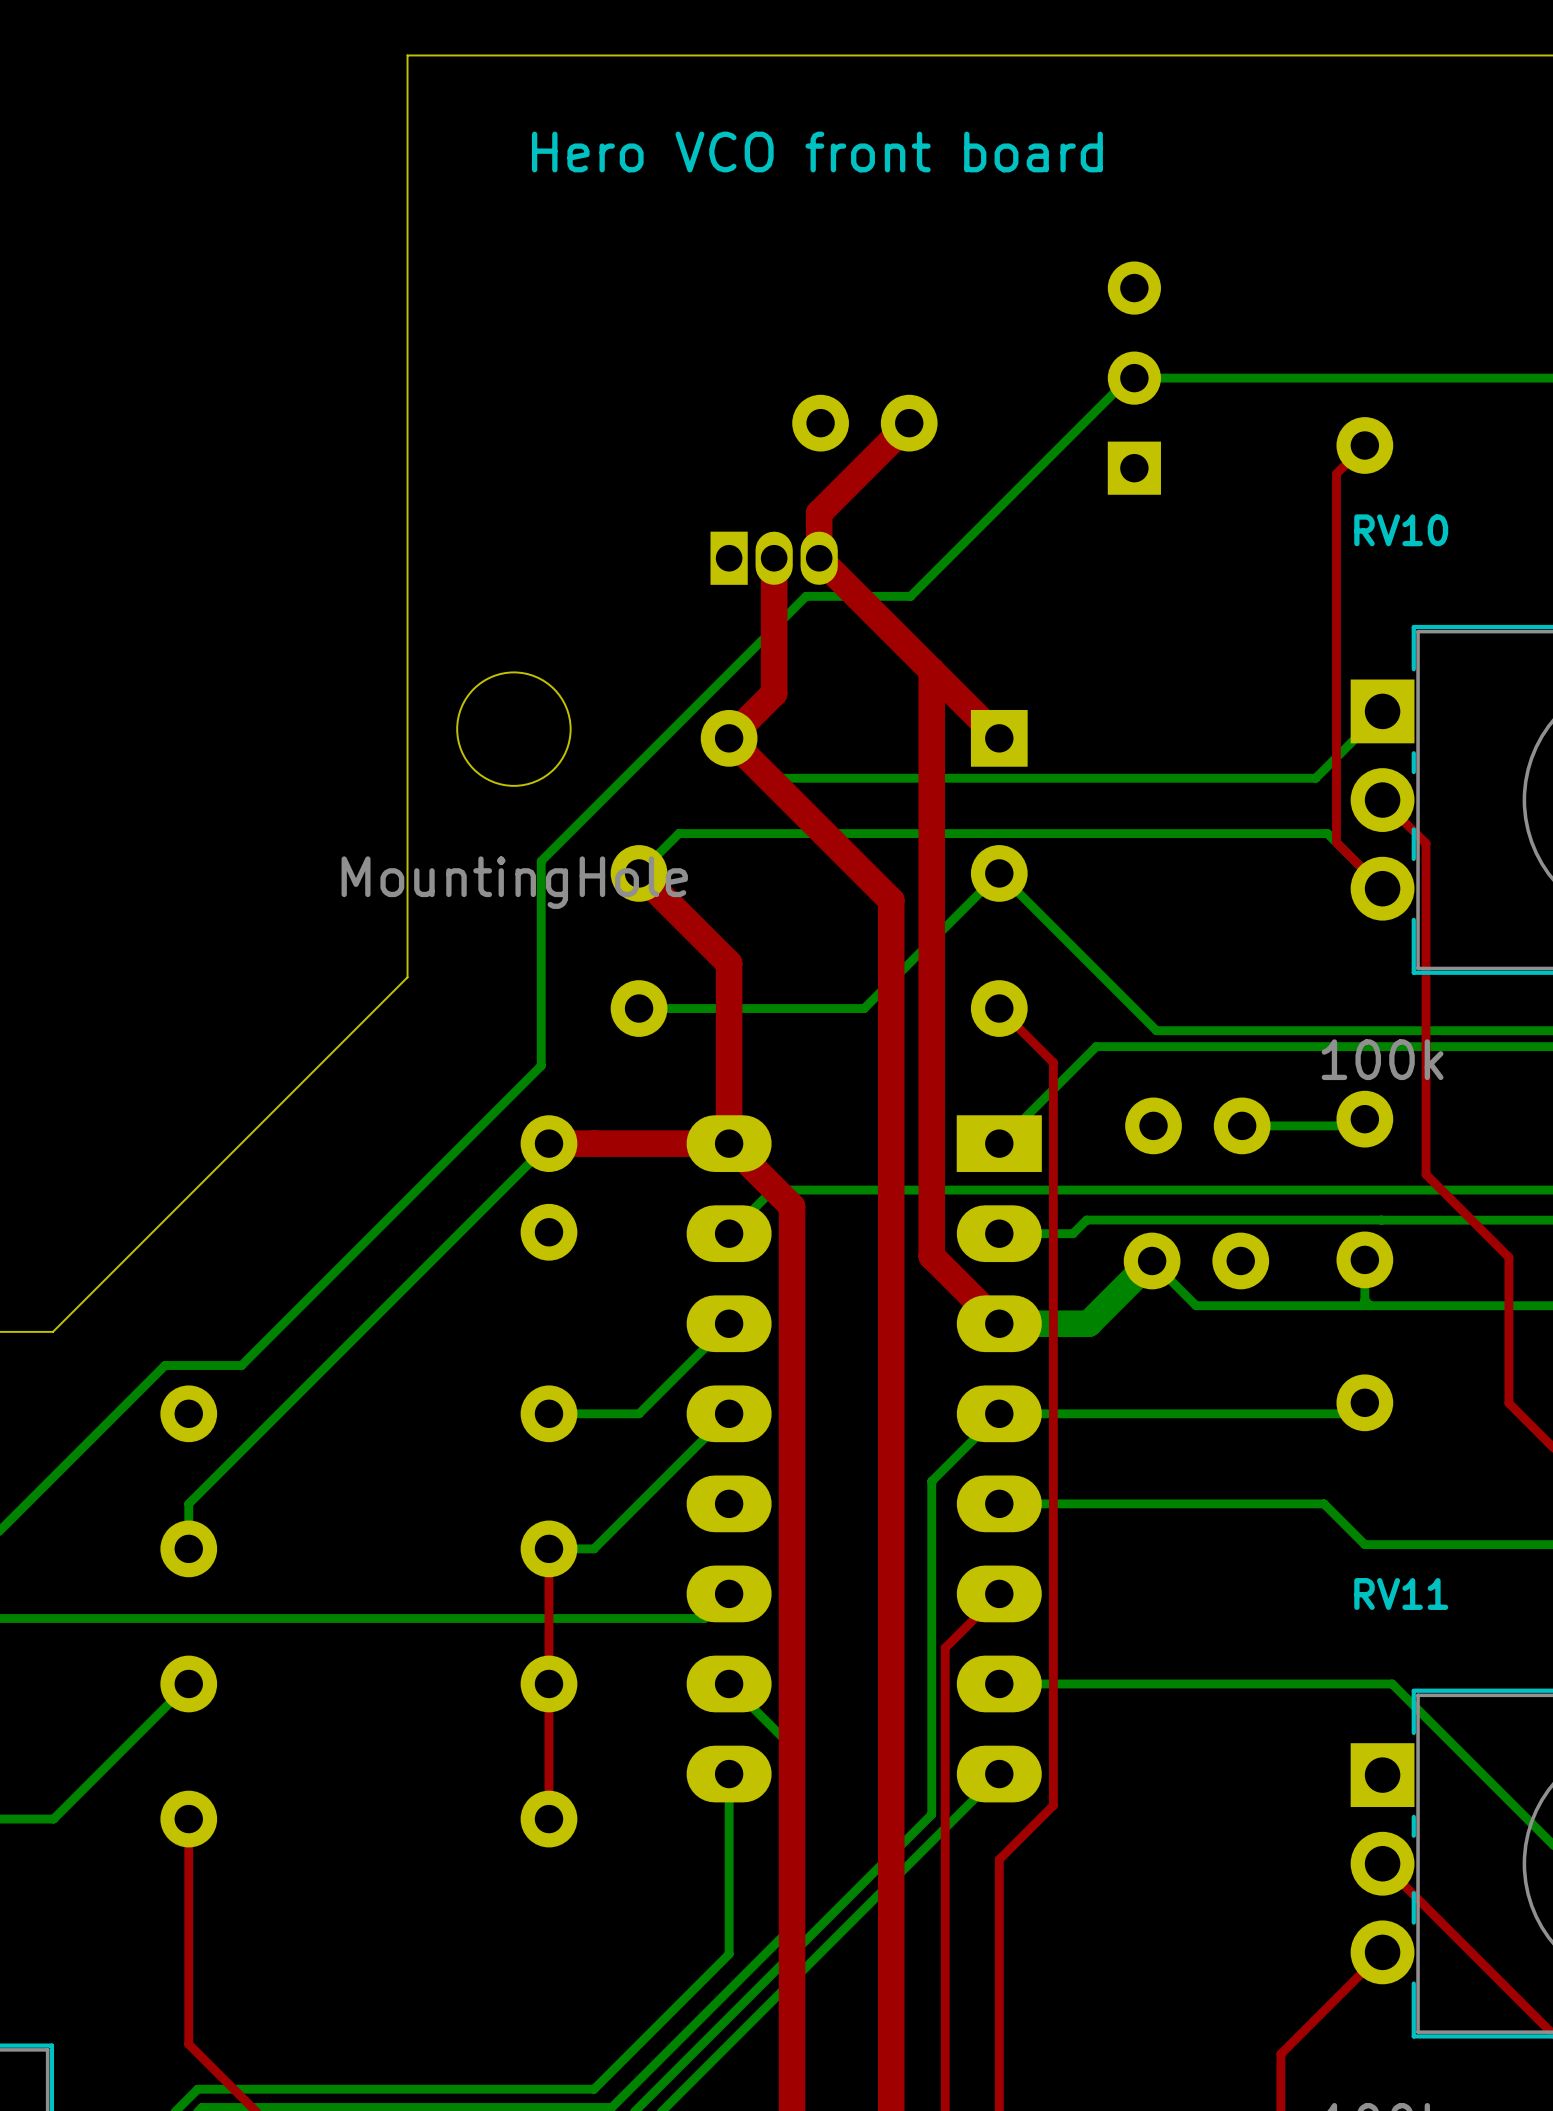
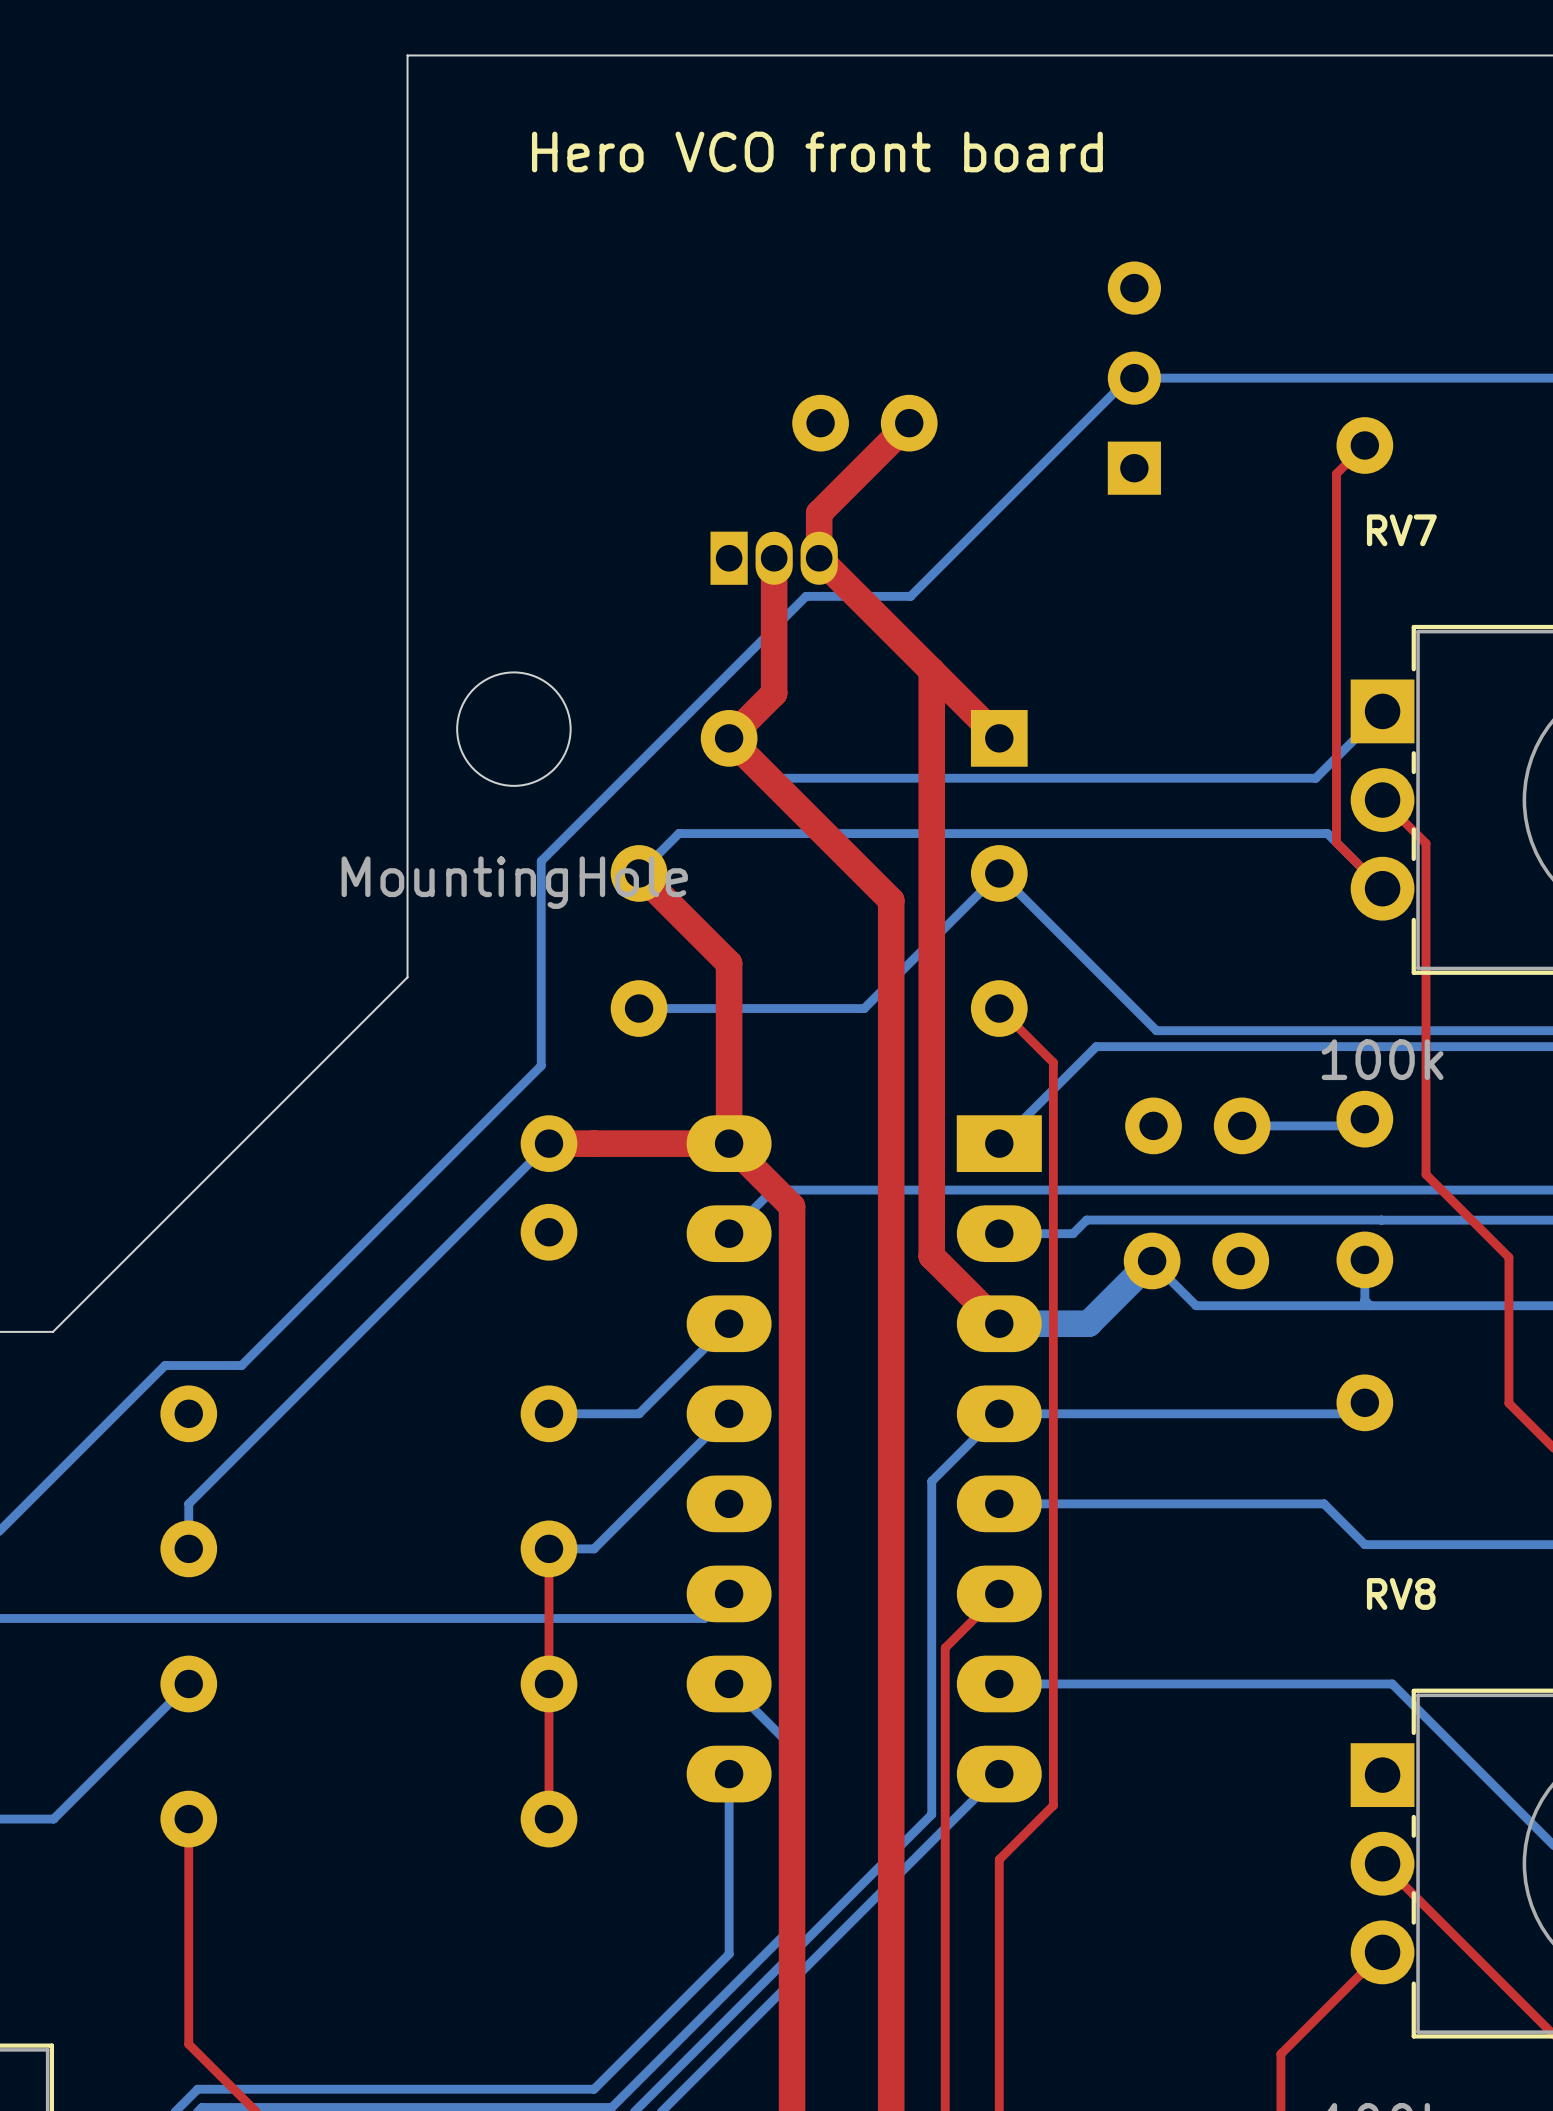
RV10 name: RV10 (1401, 530) -> RV7 (1401, 530)
RV11 name: RV11 (1401, 1593) -> RV8 (1401, 1593)

